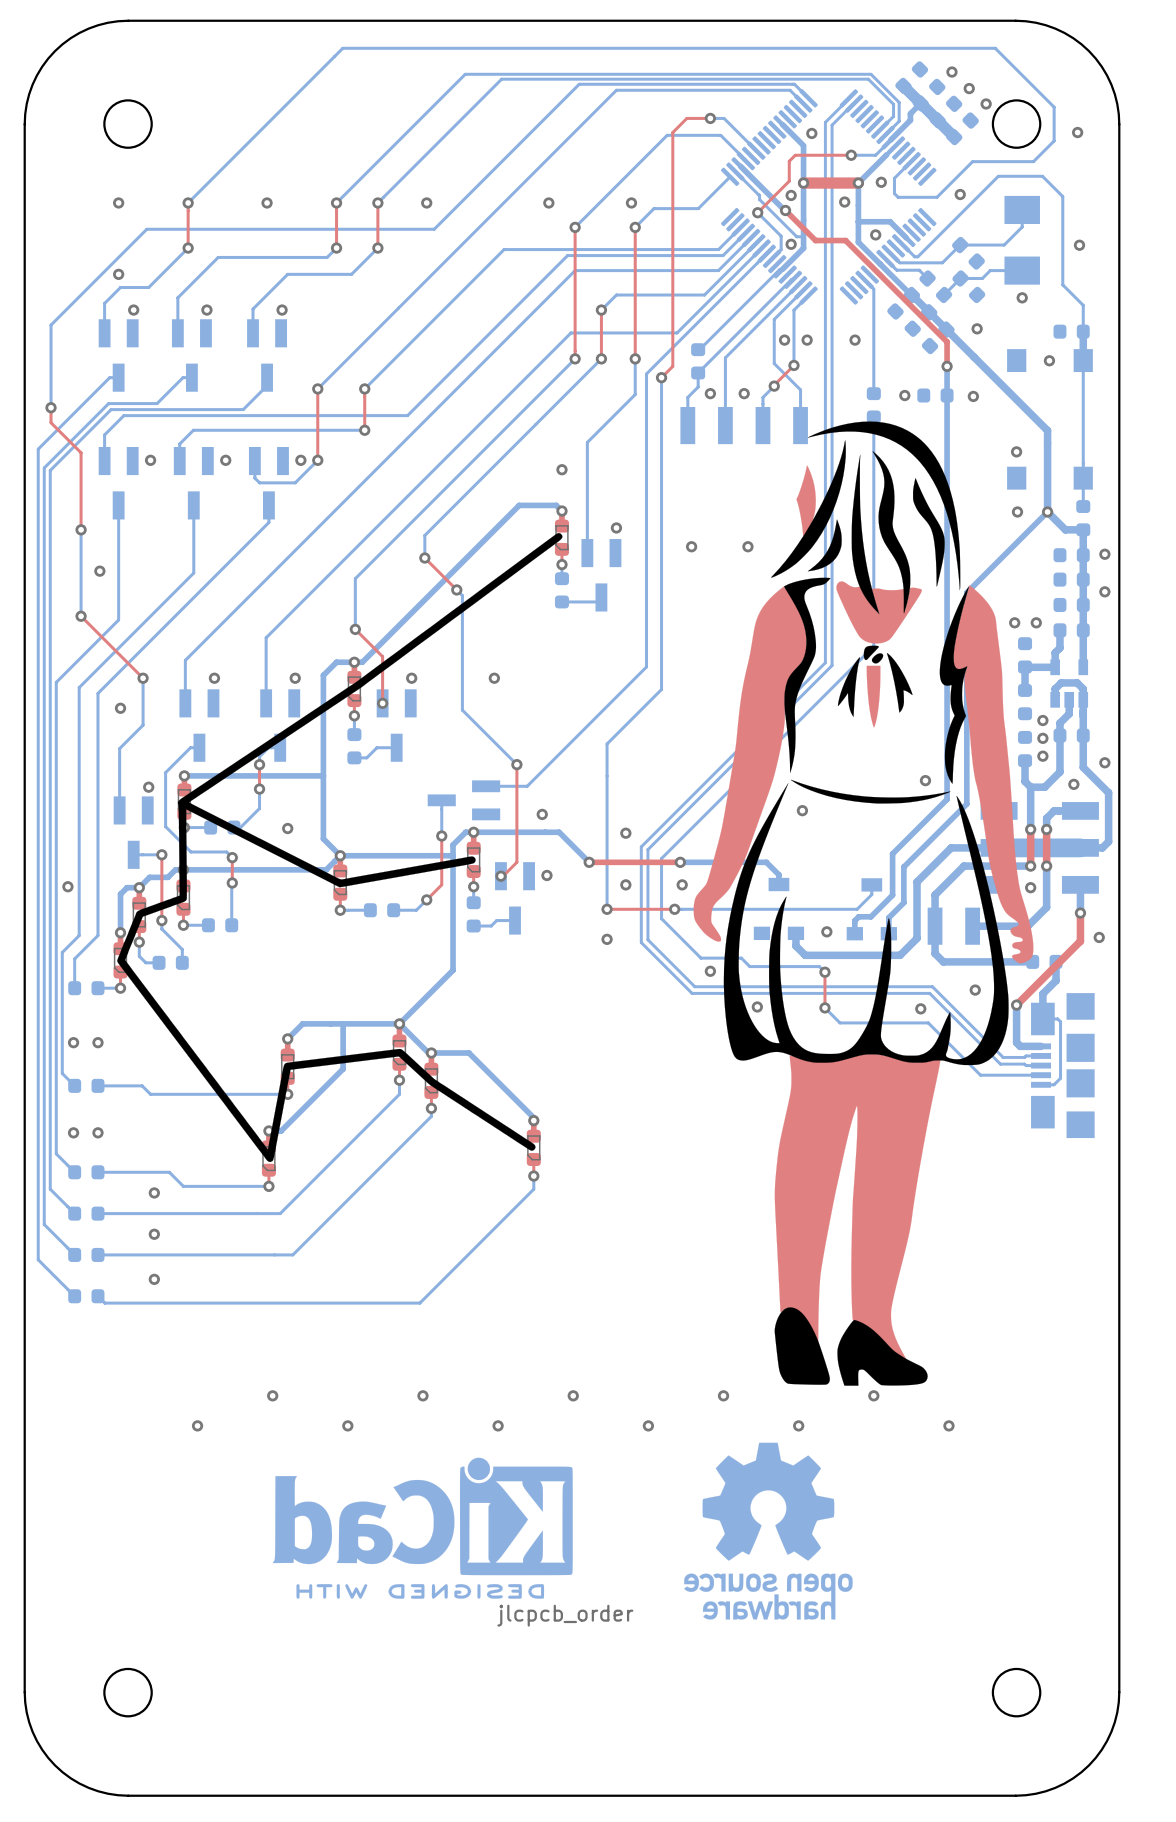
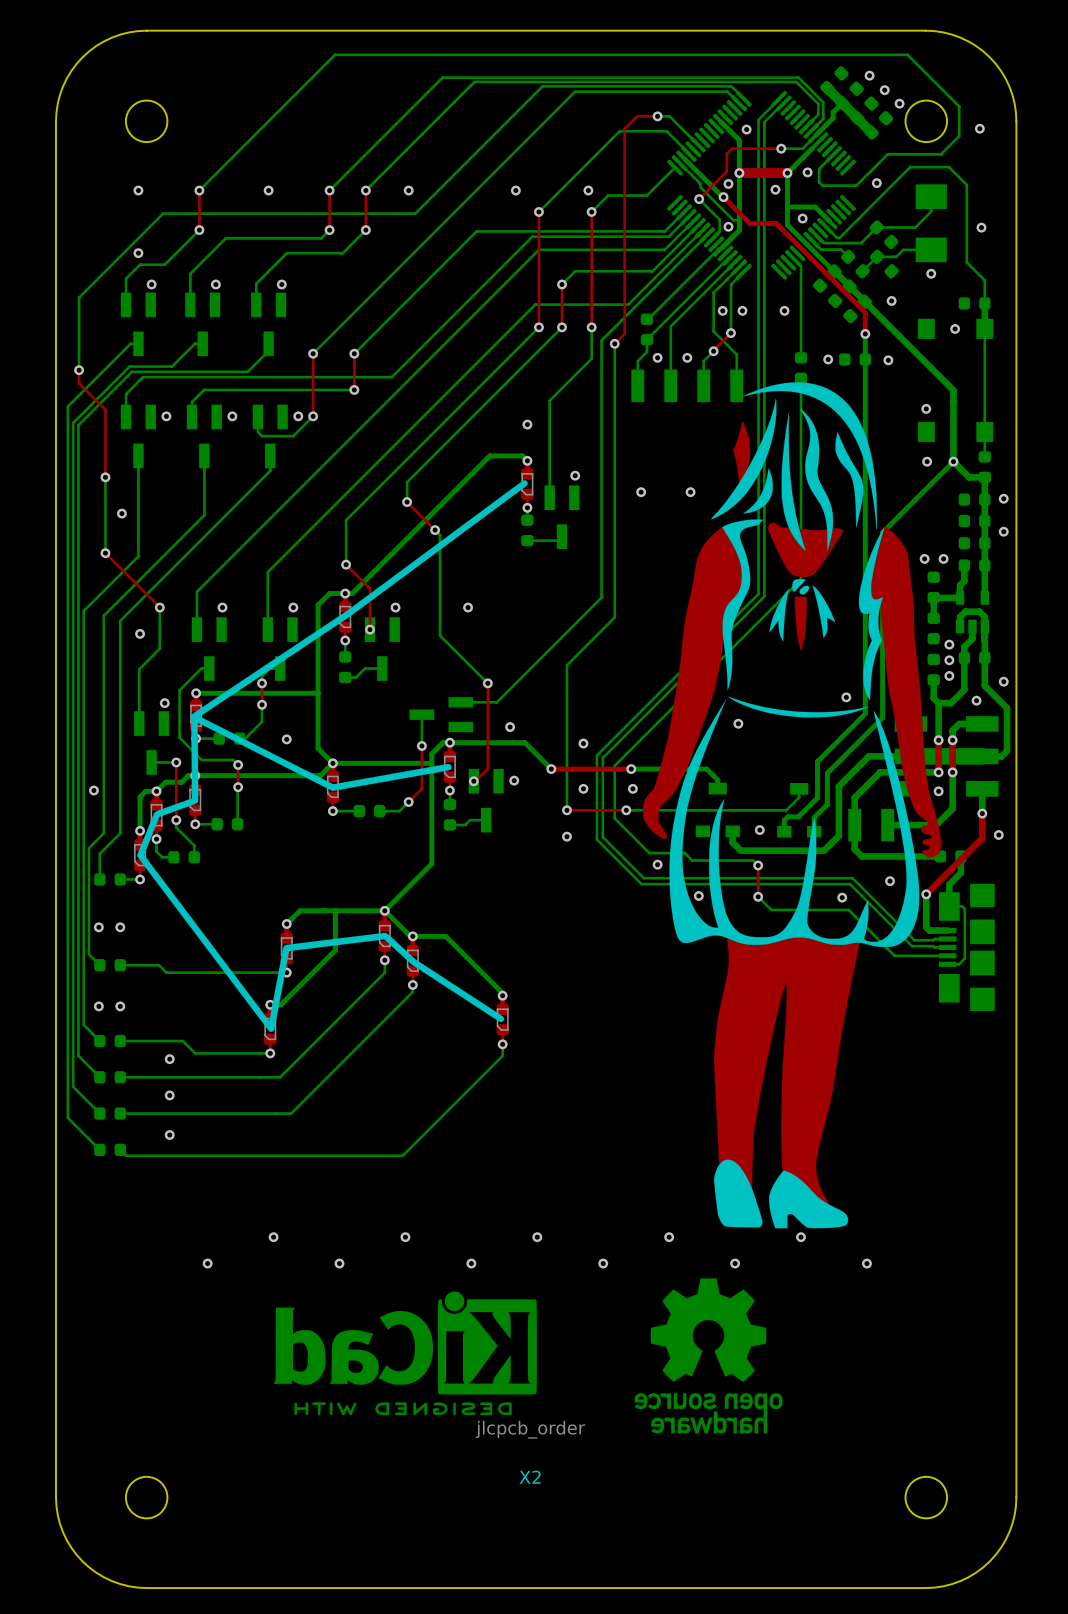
X2: none -> jlcpcb_order (530, 1452)

